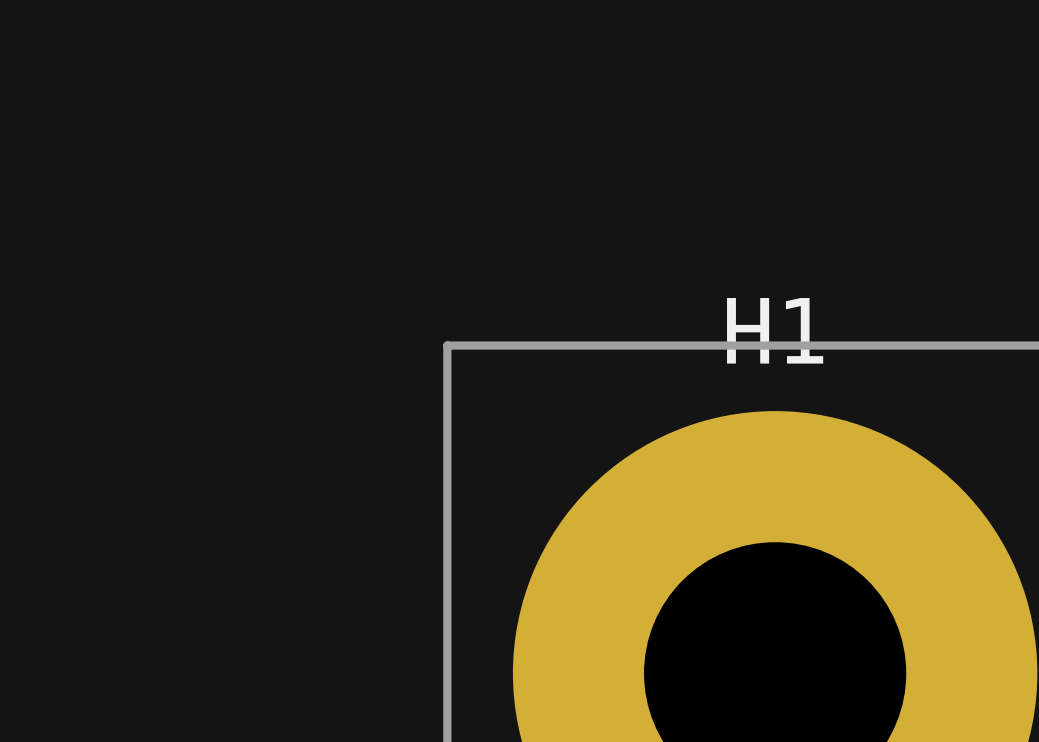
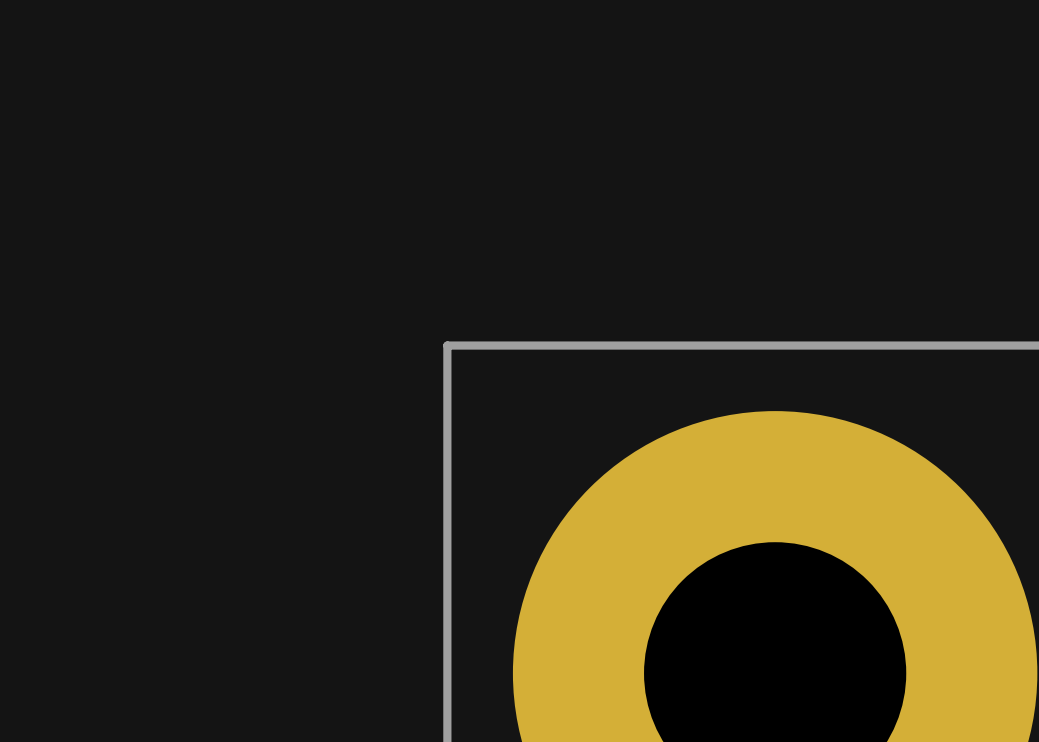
H1 name: H1 (775, 330) -> none

